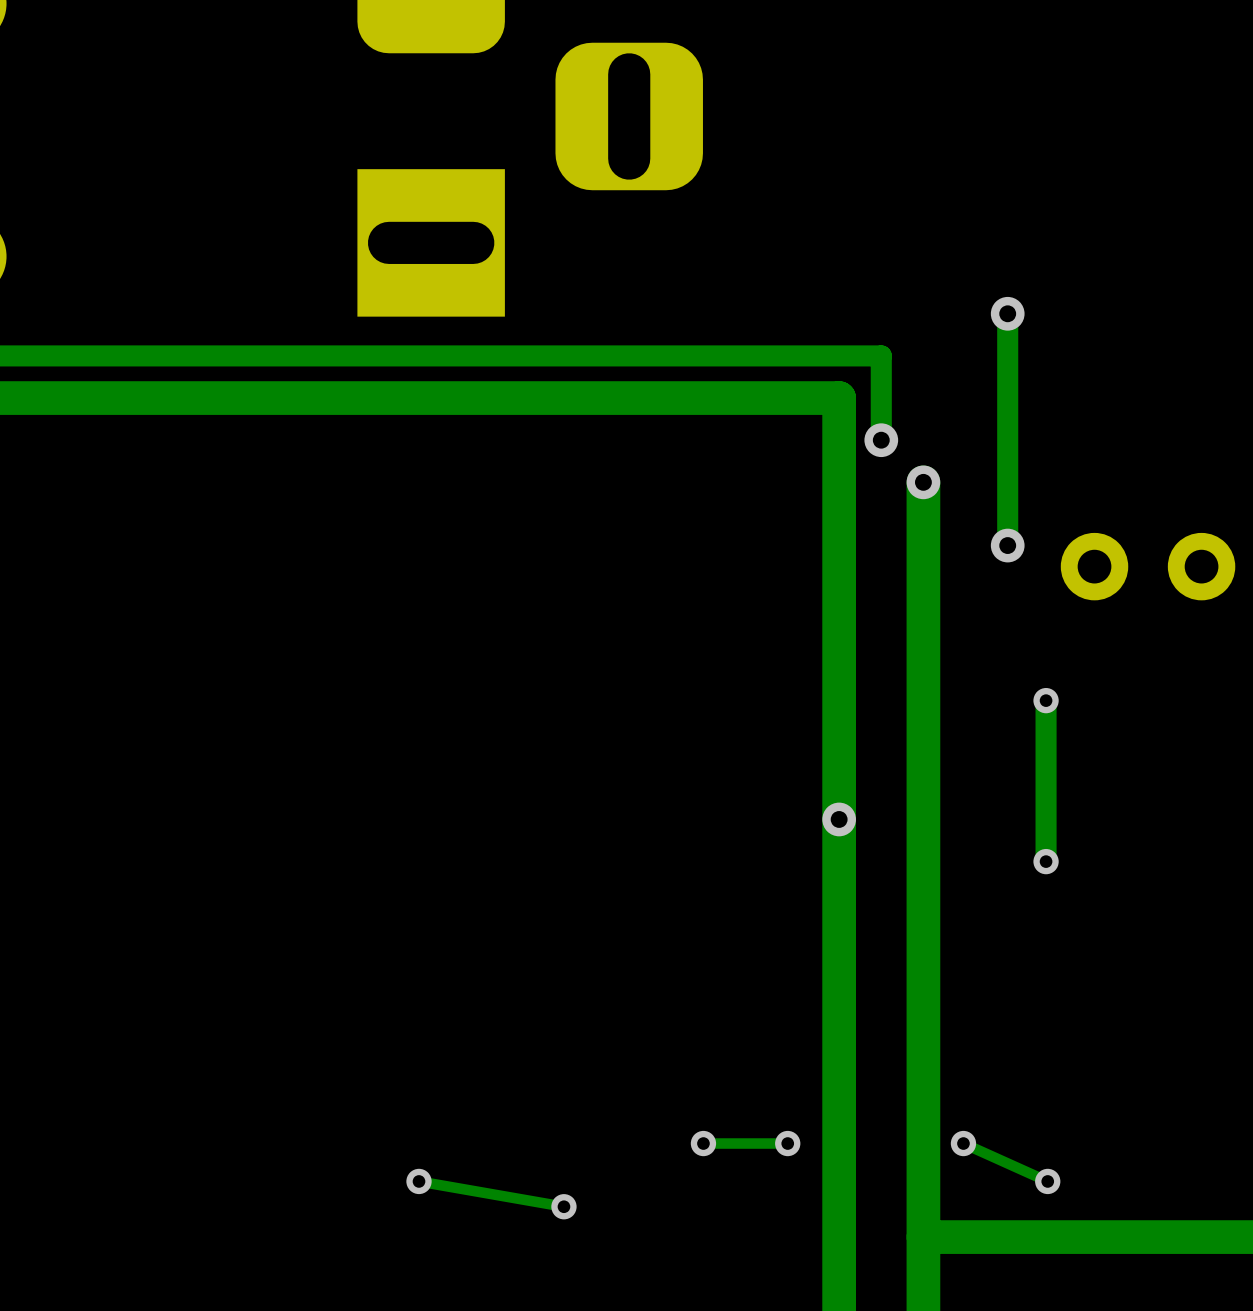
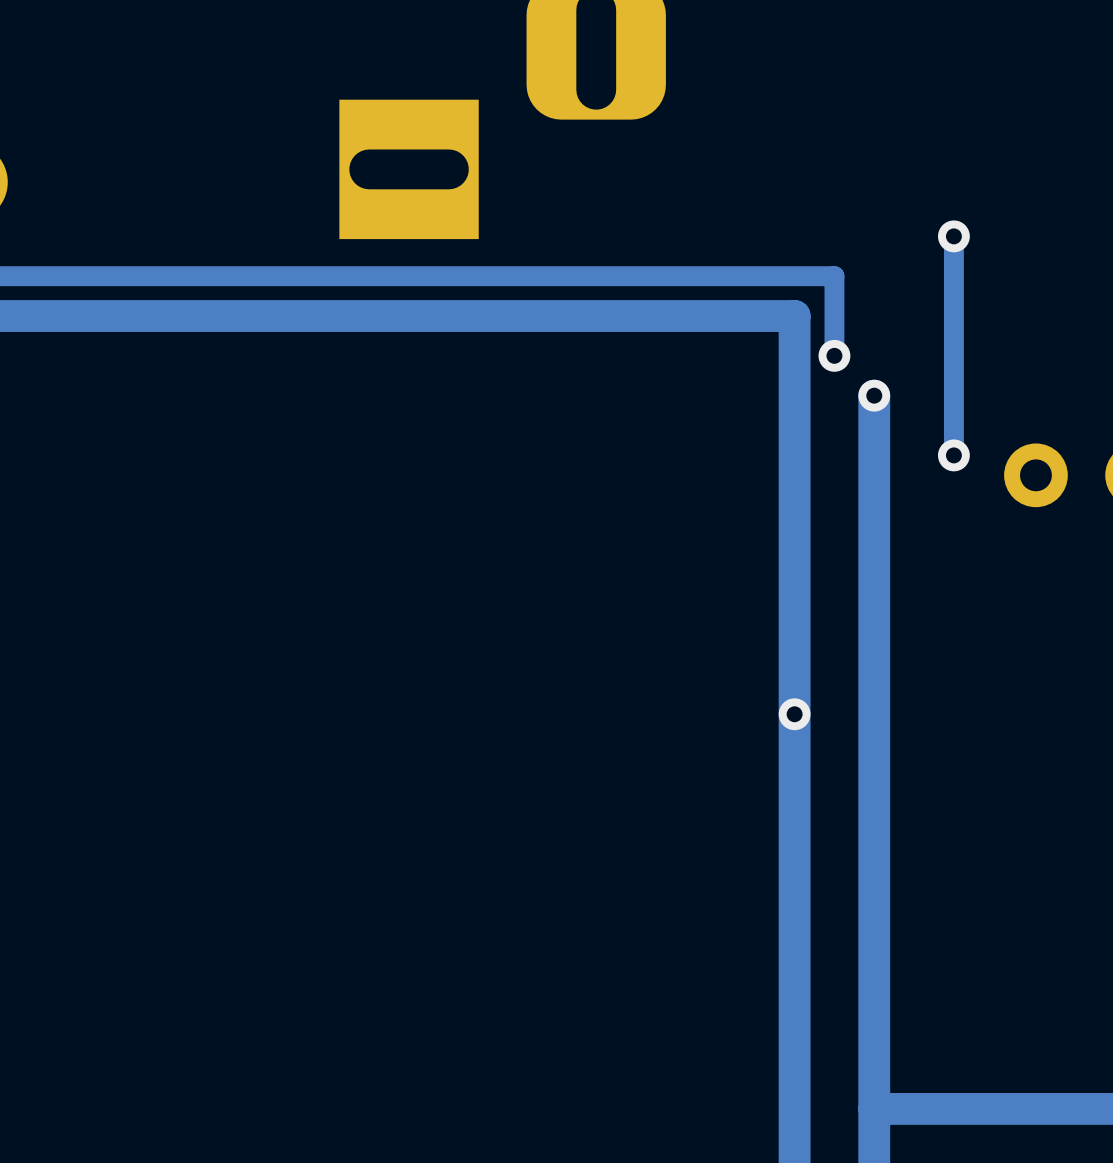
track: (1046, 700) (1046, 861) -> none
via: (1046, 700) -> none
via: (1046, 861) -> none
via: (703, 1143) -> none
track: (787, 1143) (703, 1143) -> none
via: (787, 1143) -> none
track: (963, 1143) (1047, 1181) -> none
via: (963, 1143) -> none
track: (419, 1181) (563, 1206) -> none
via: (419, 1181) -> none
via: (1047, 1181) -> none
via: (563, 1206) -> none

